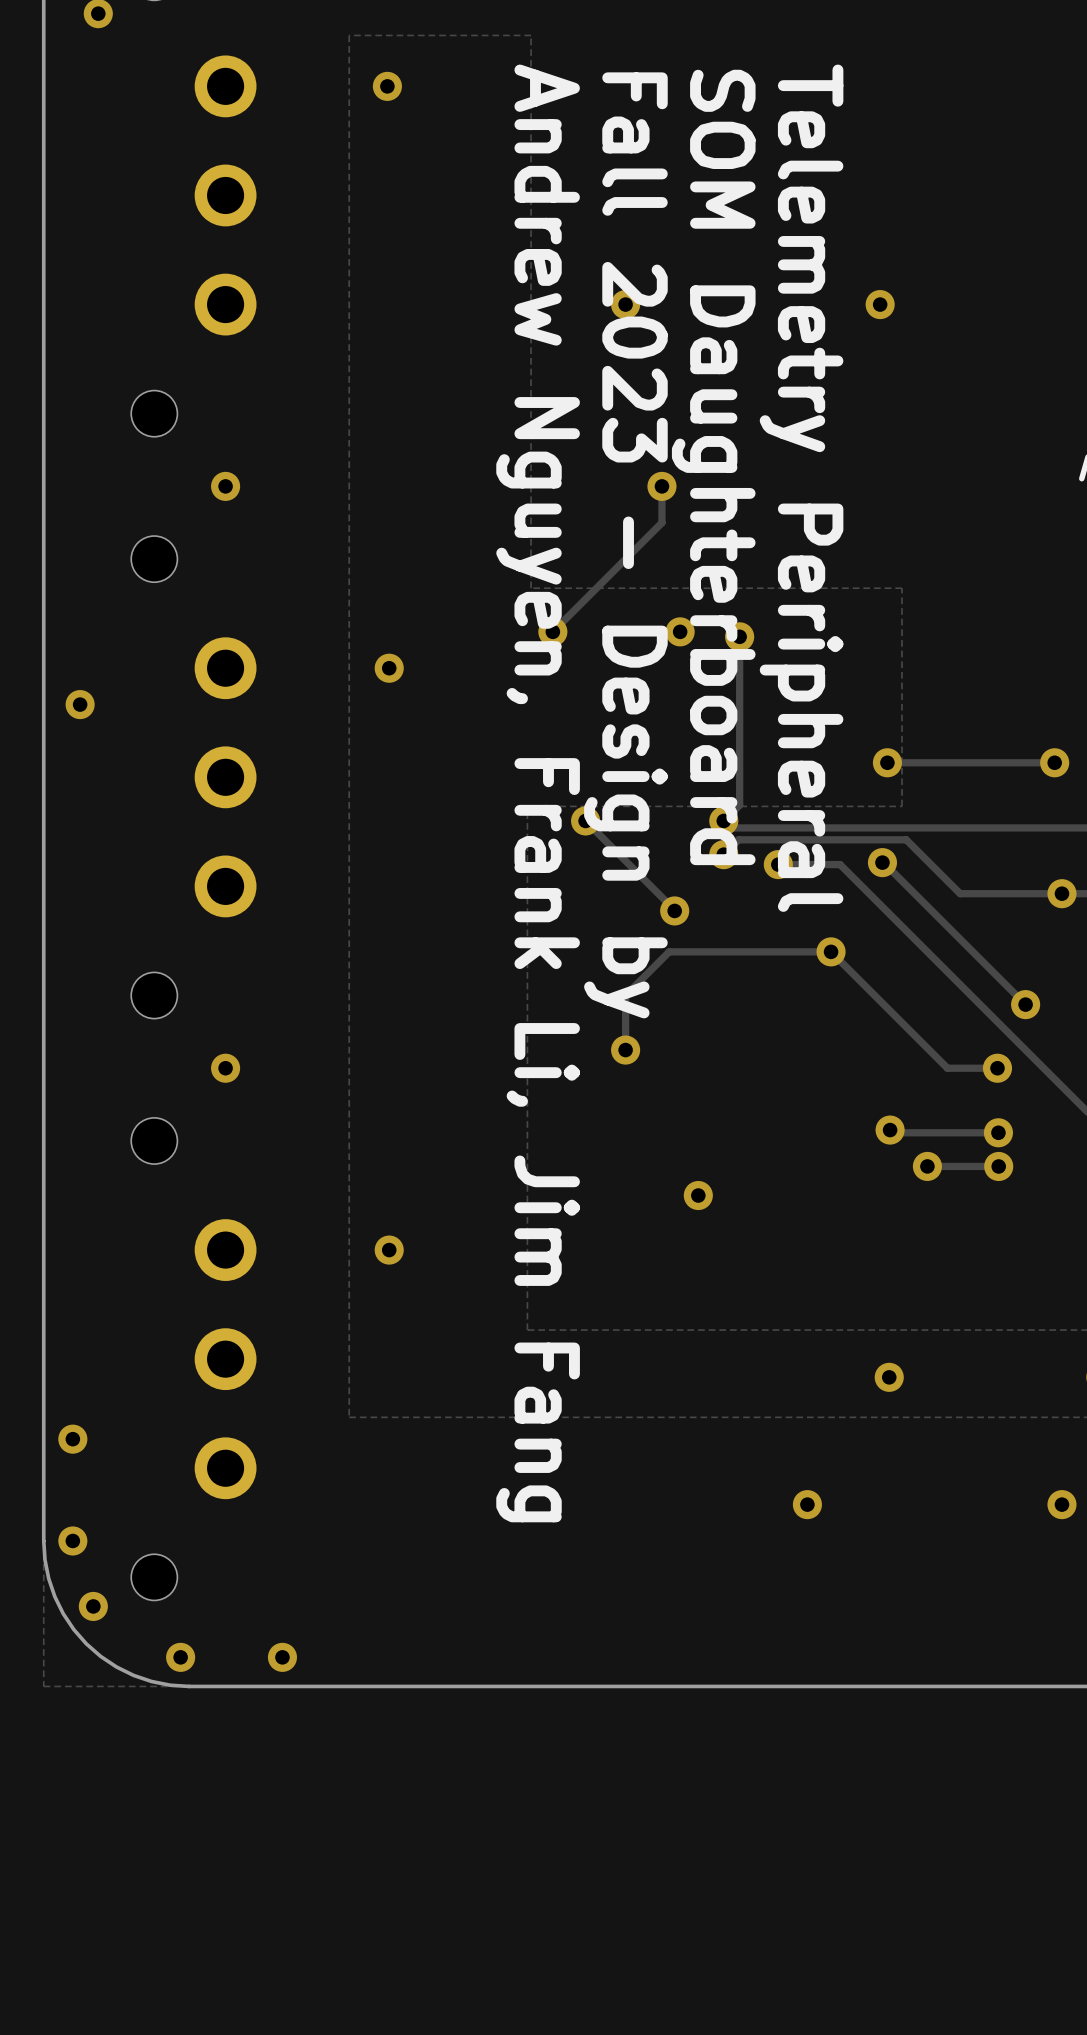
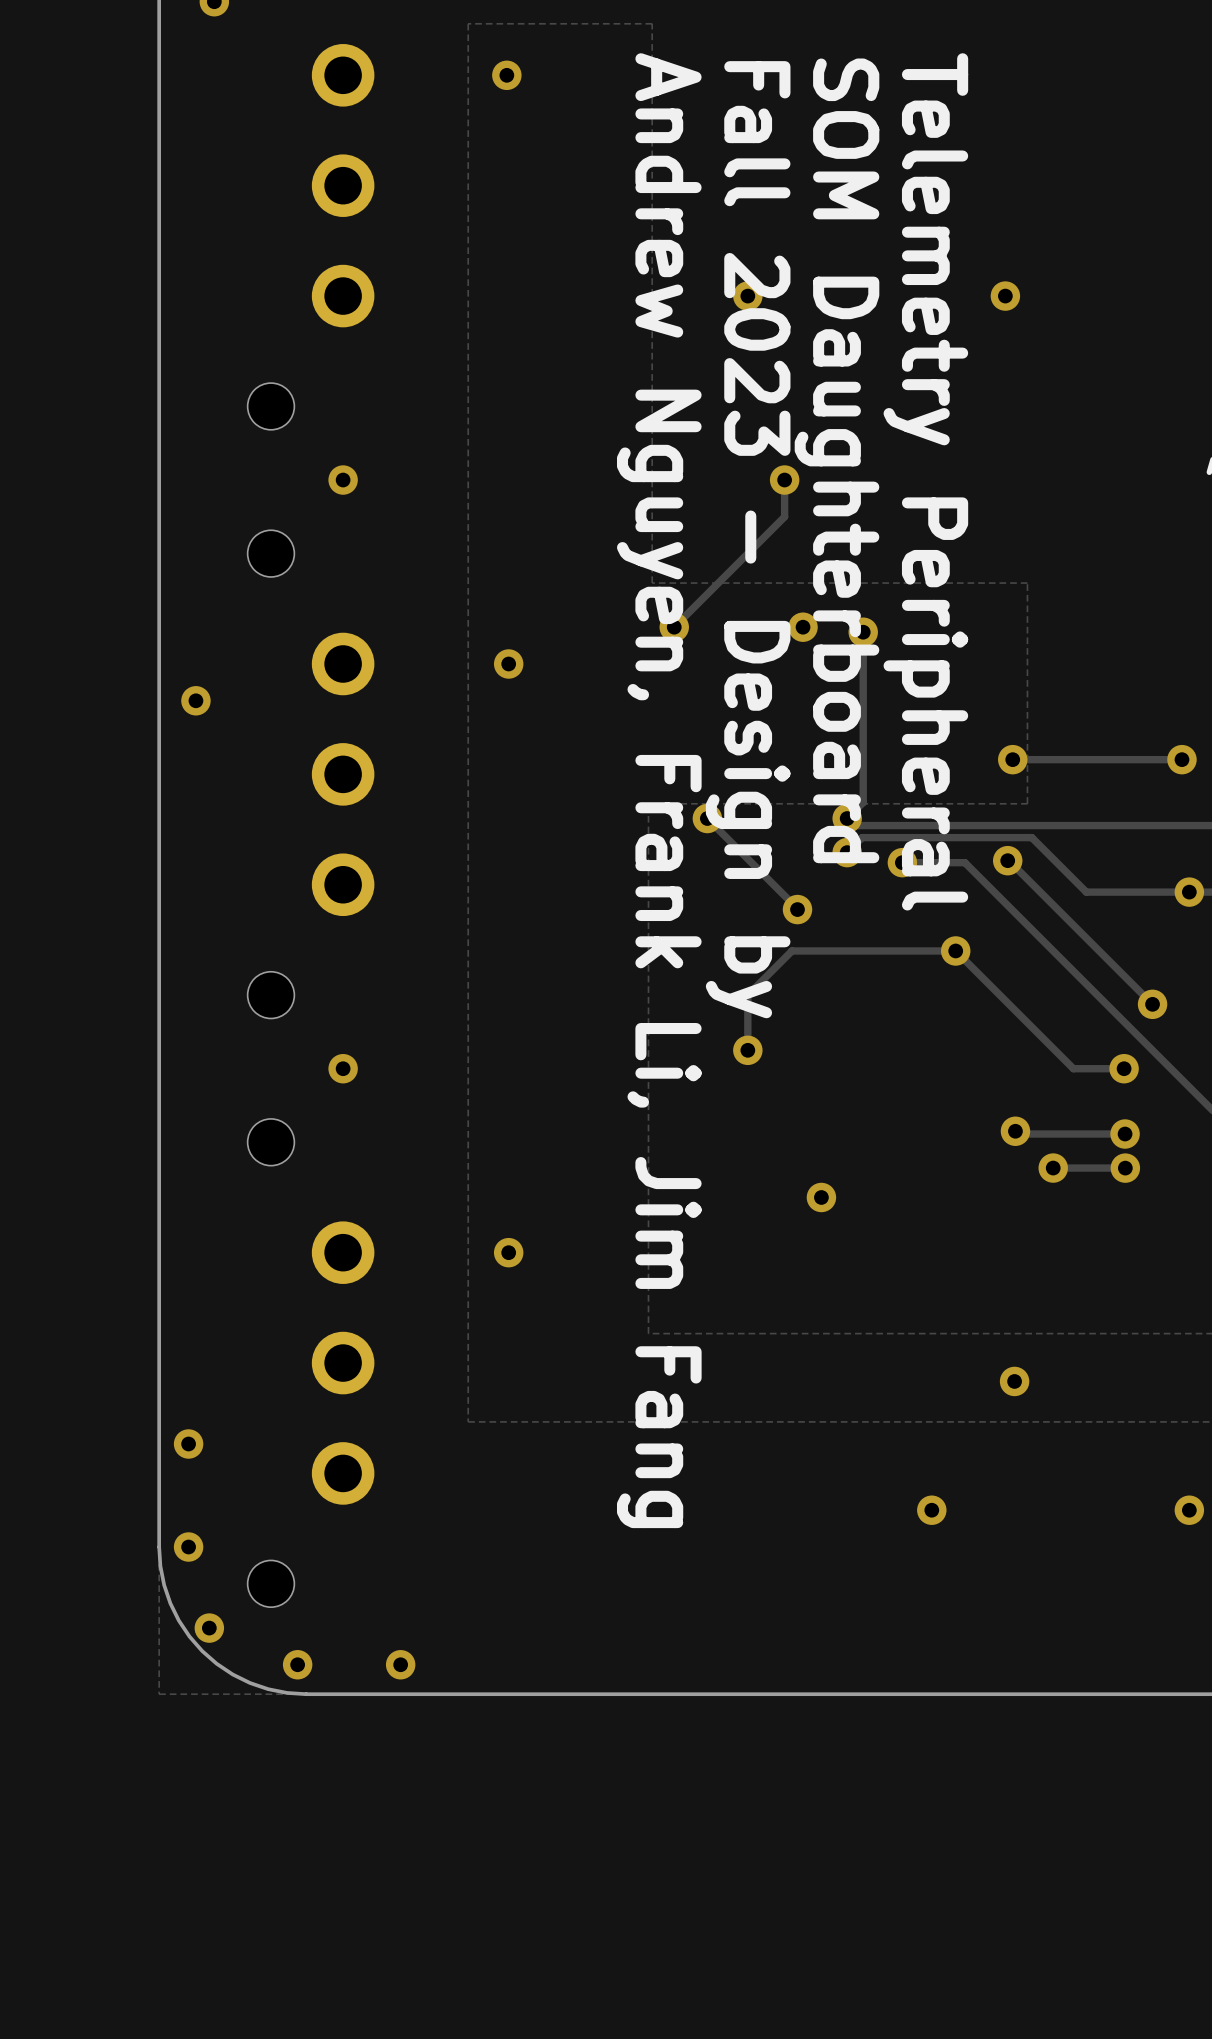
via position: (93, 1606) -> (209, 1628)

